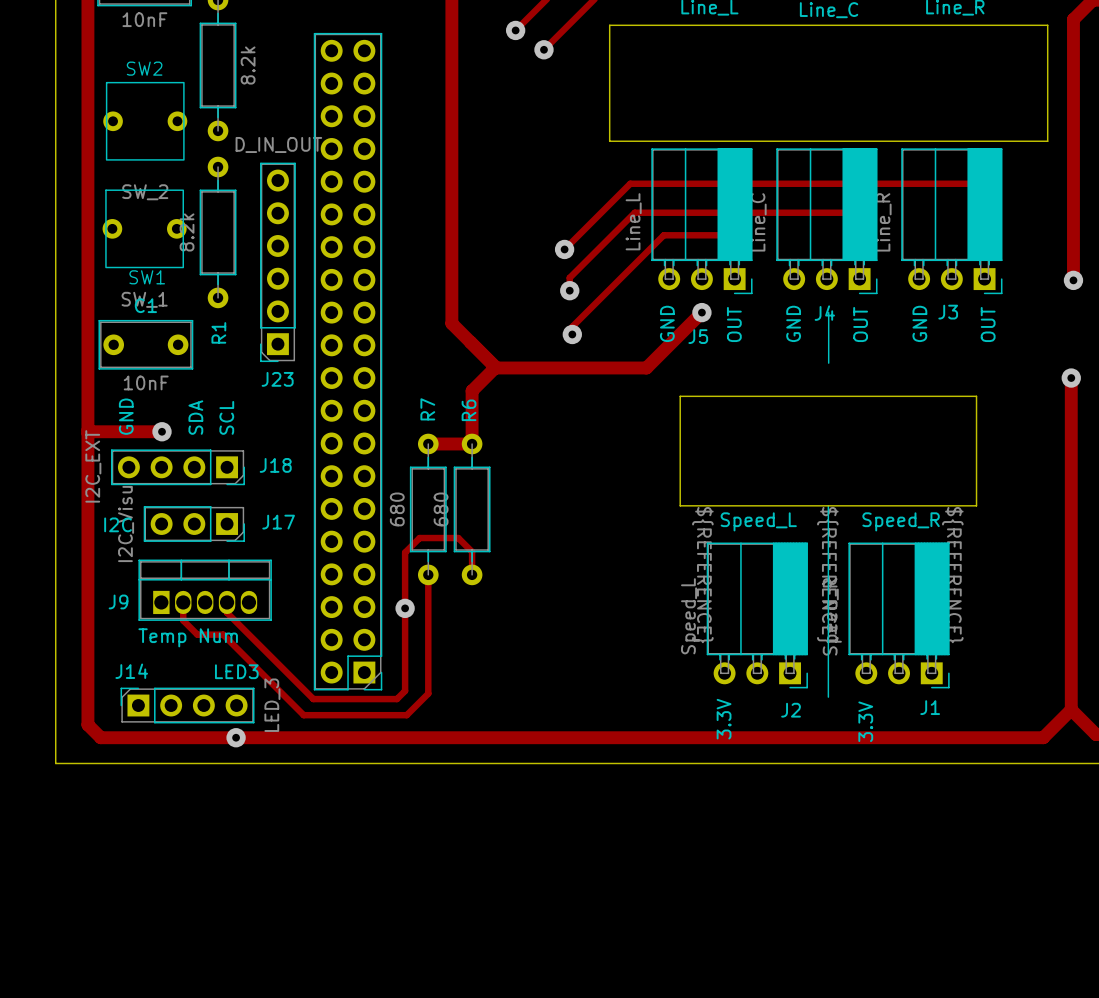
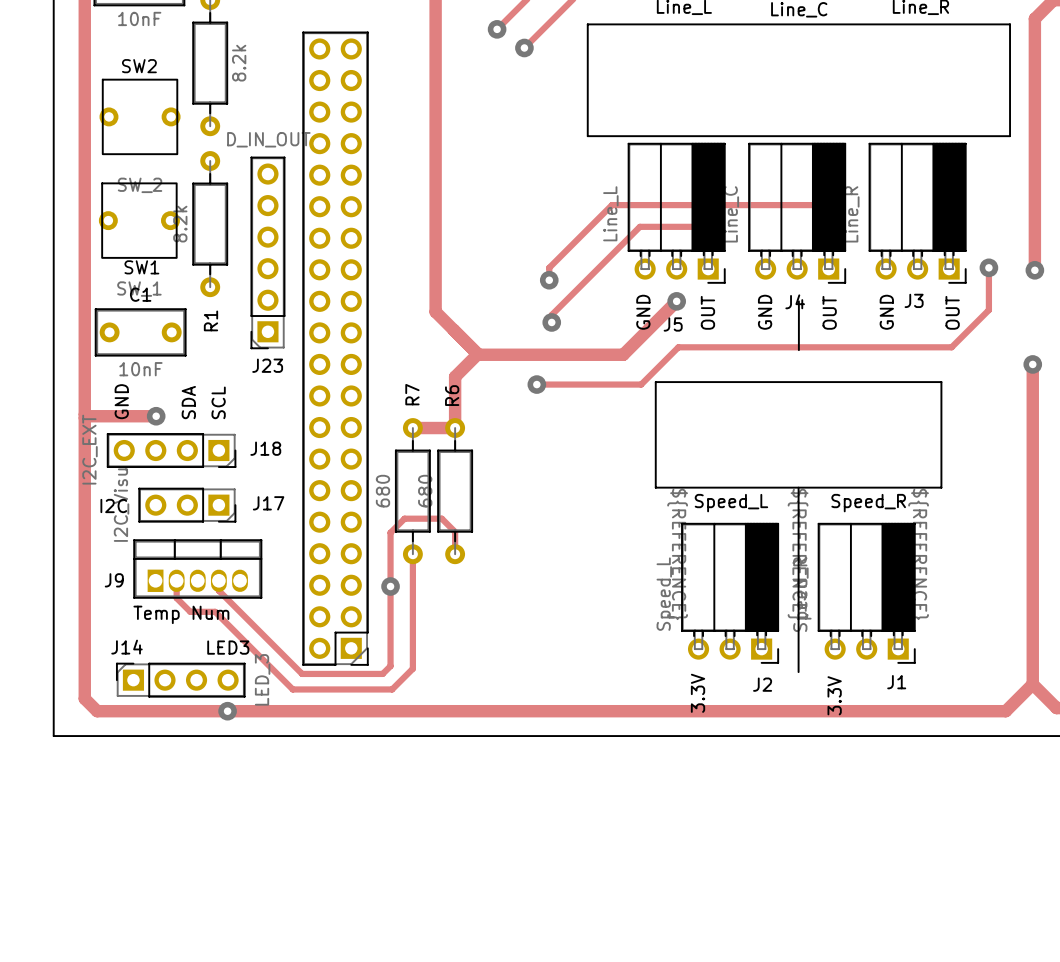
track: (986, 183) (630, 183) (564, 249) -> none
via: (564, 249) -> none
track: none -> (988, 267) (988, 310) (951, 347) (678, 347) (641, 384) (536, 384)
via: none -> (988, 267)
via: none -> (536, 384)

